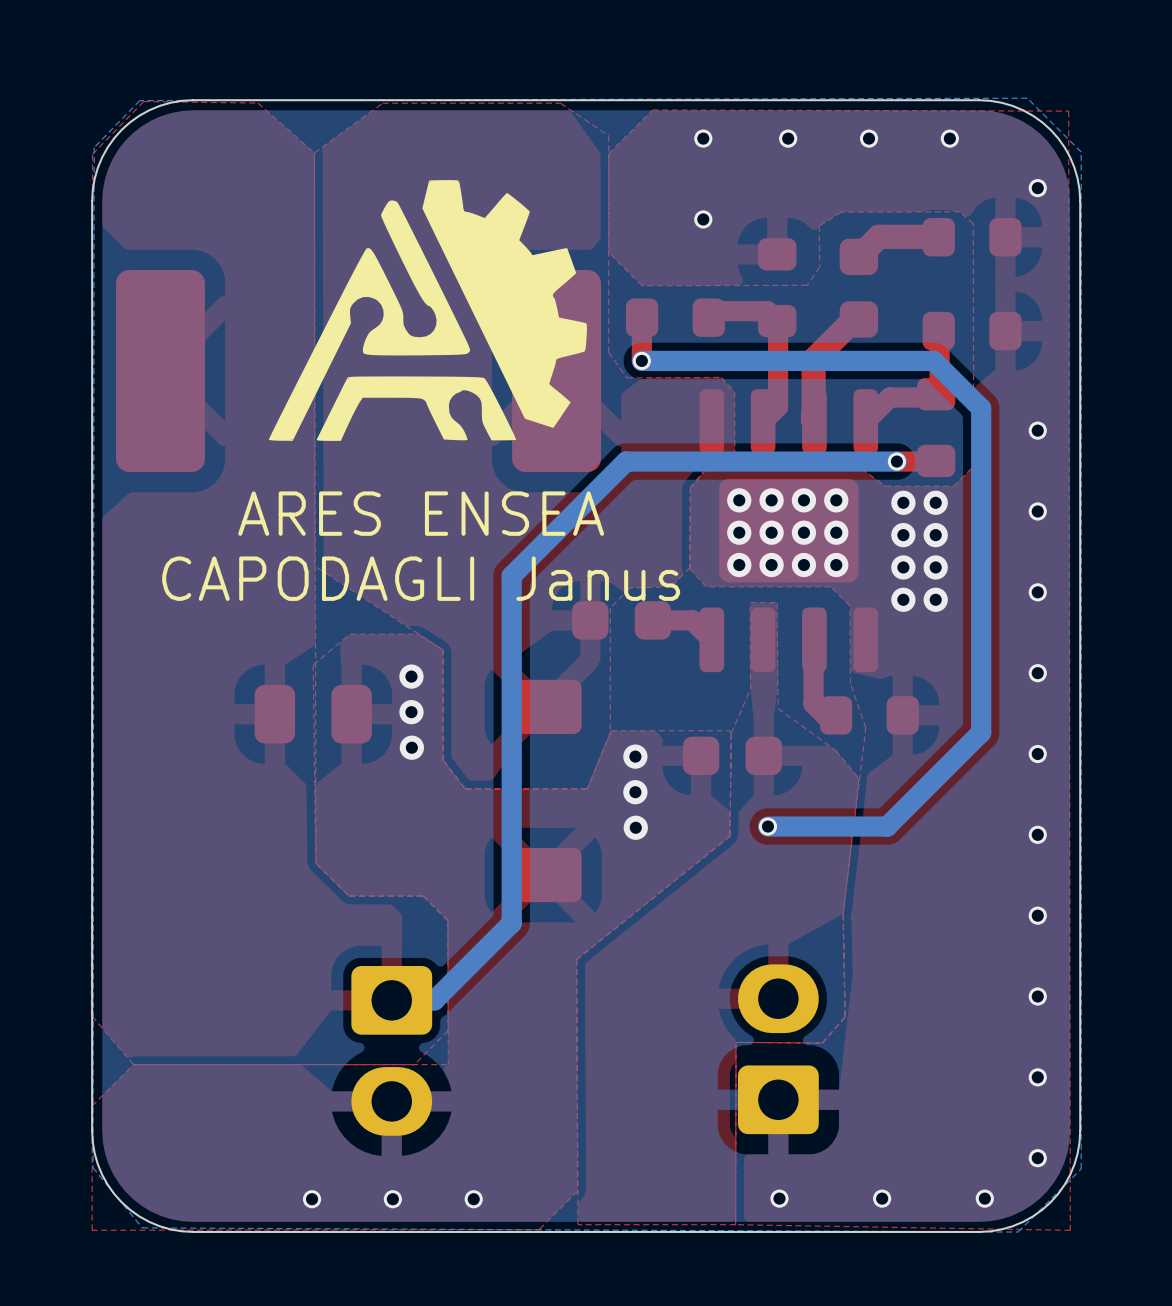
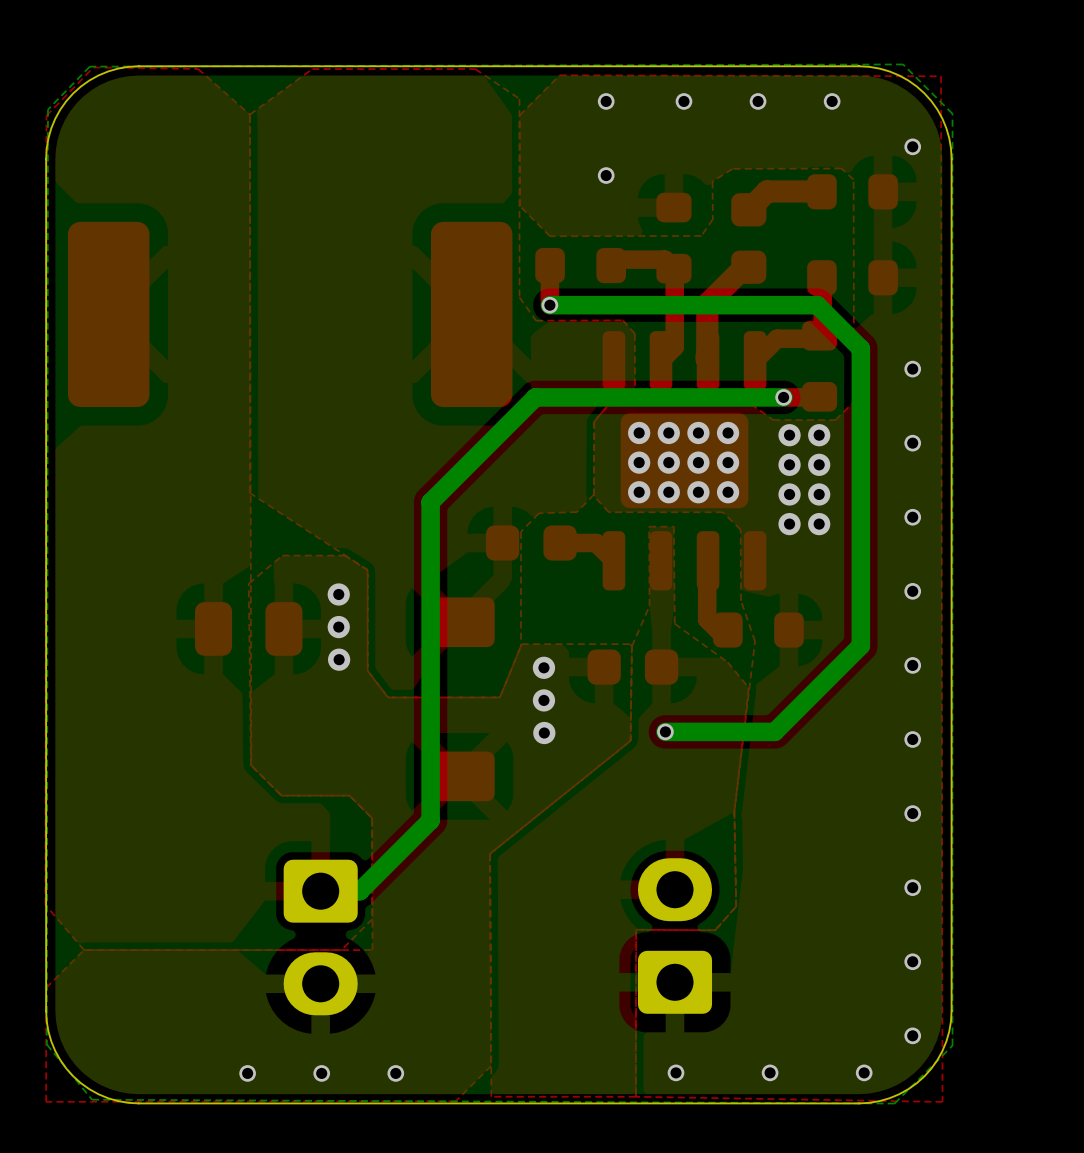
drawing: [268, 180, 587, 441] -> none
text: ARES ENSEA (421, 513) -> none
text: CAPODAGLI Janus (421, 578) -> none

